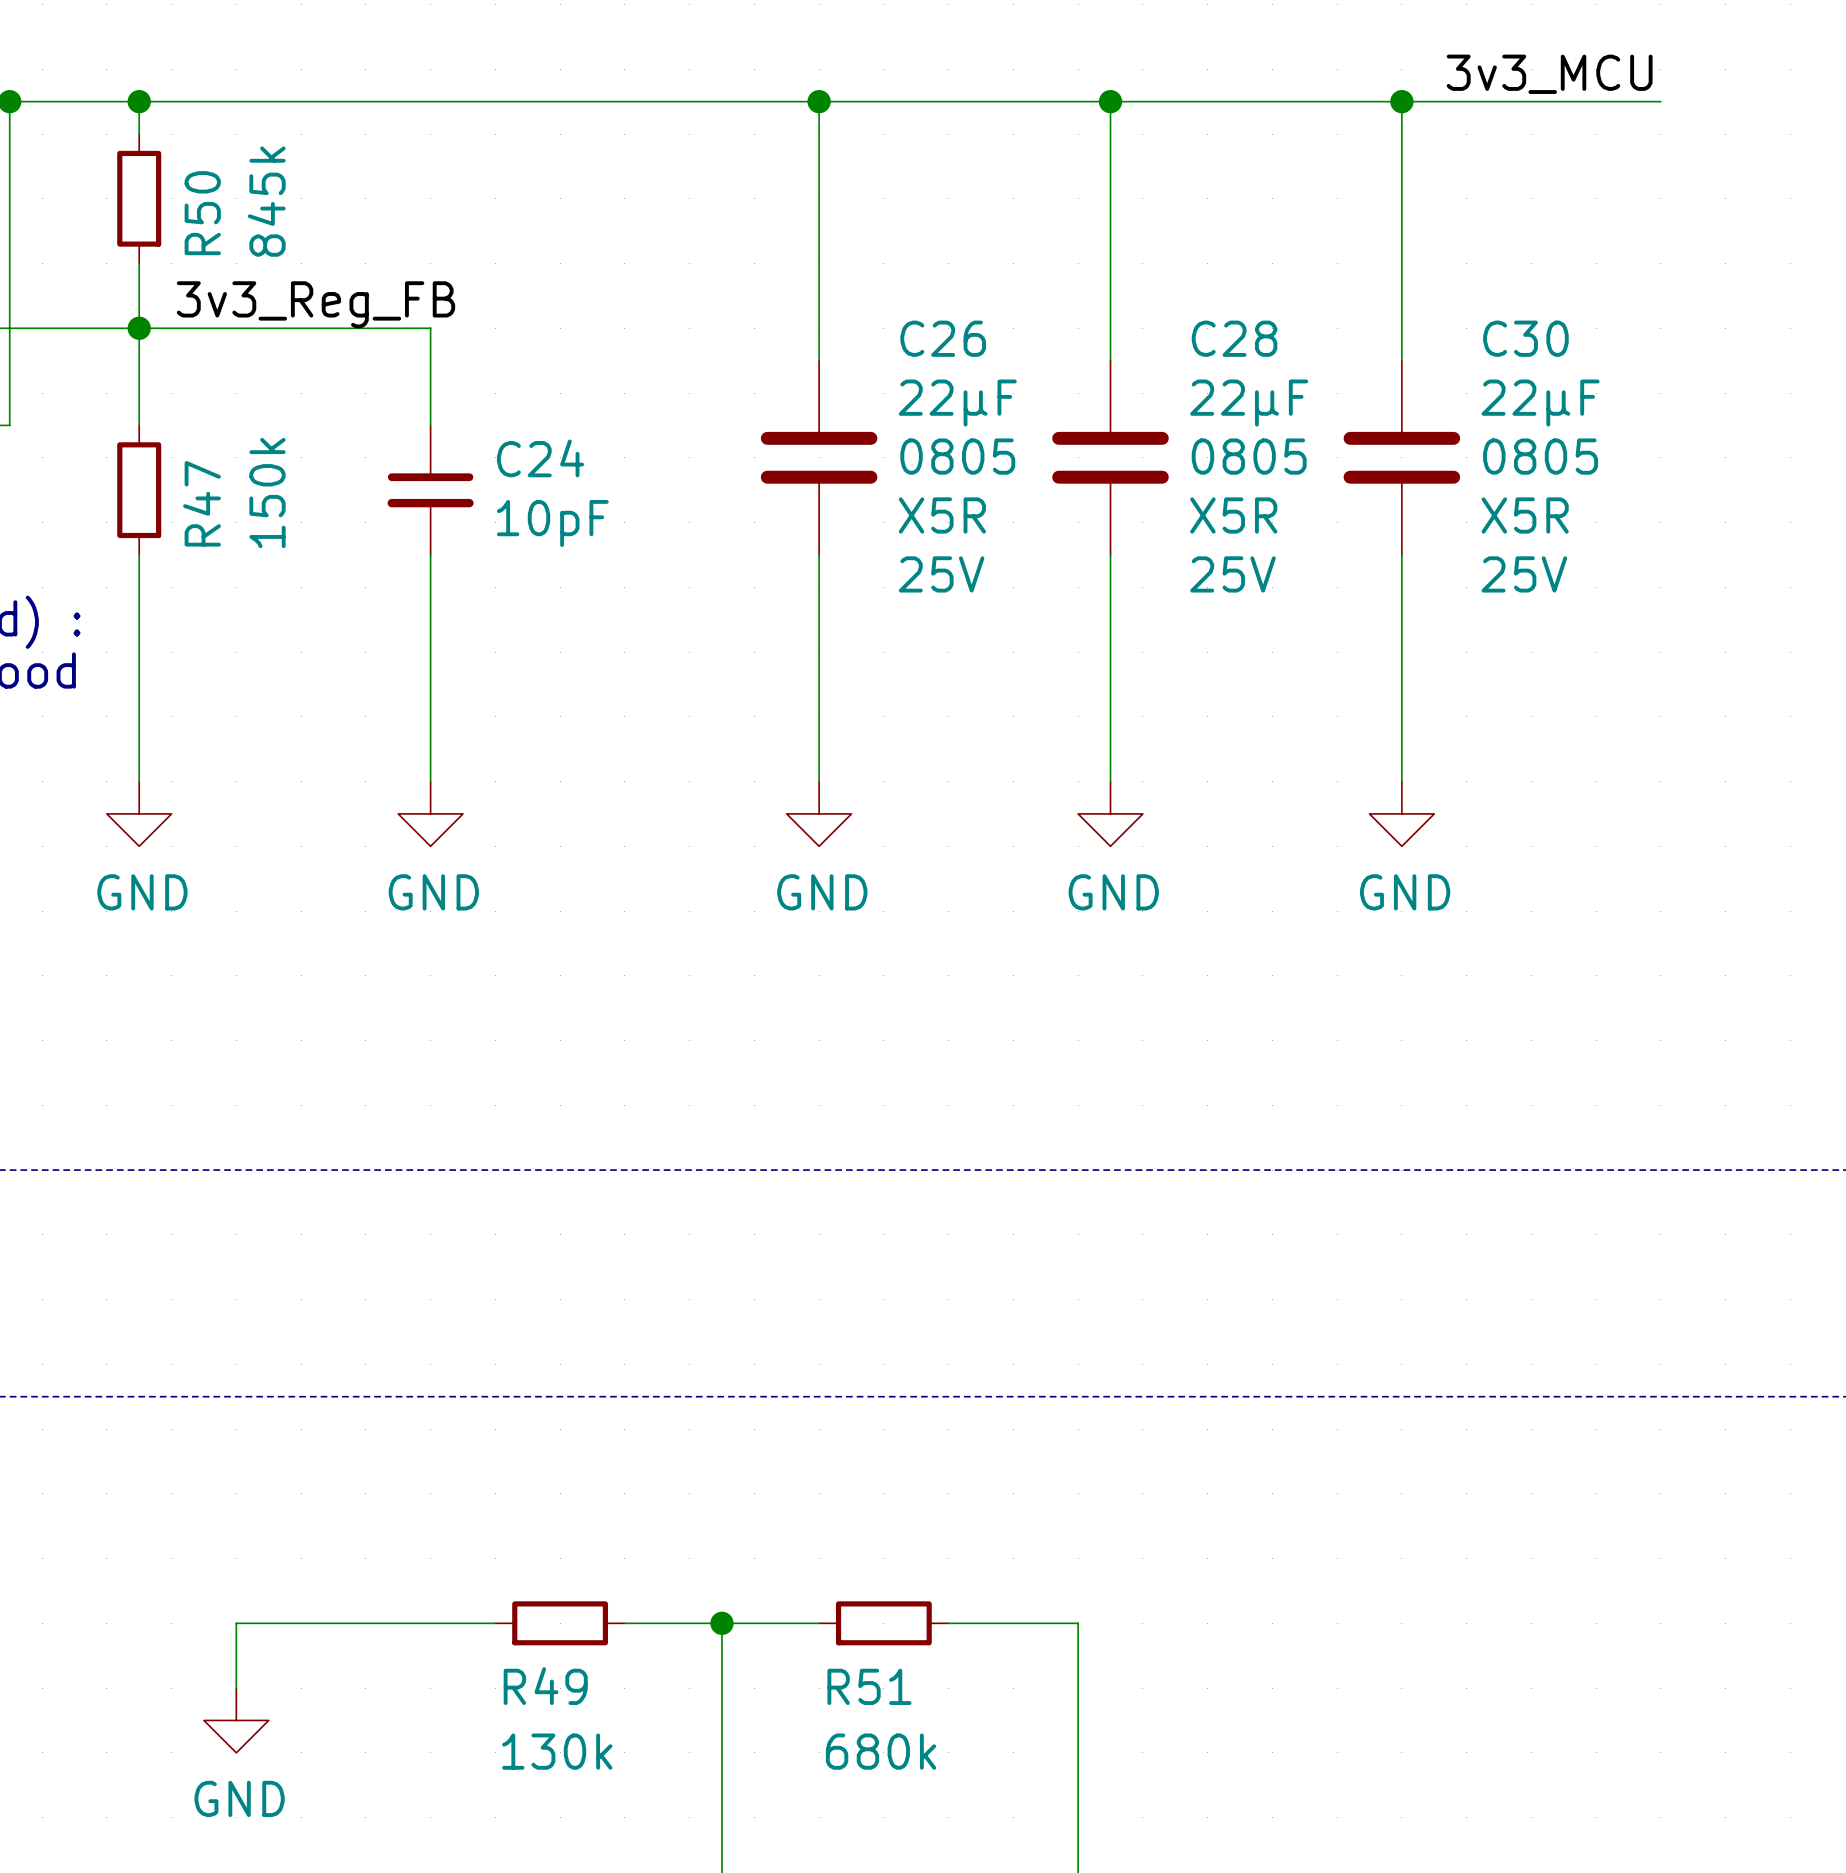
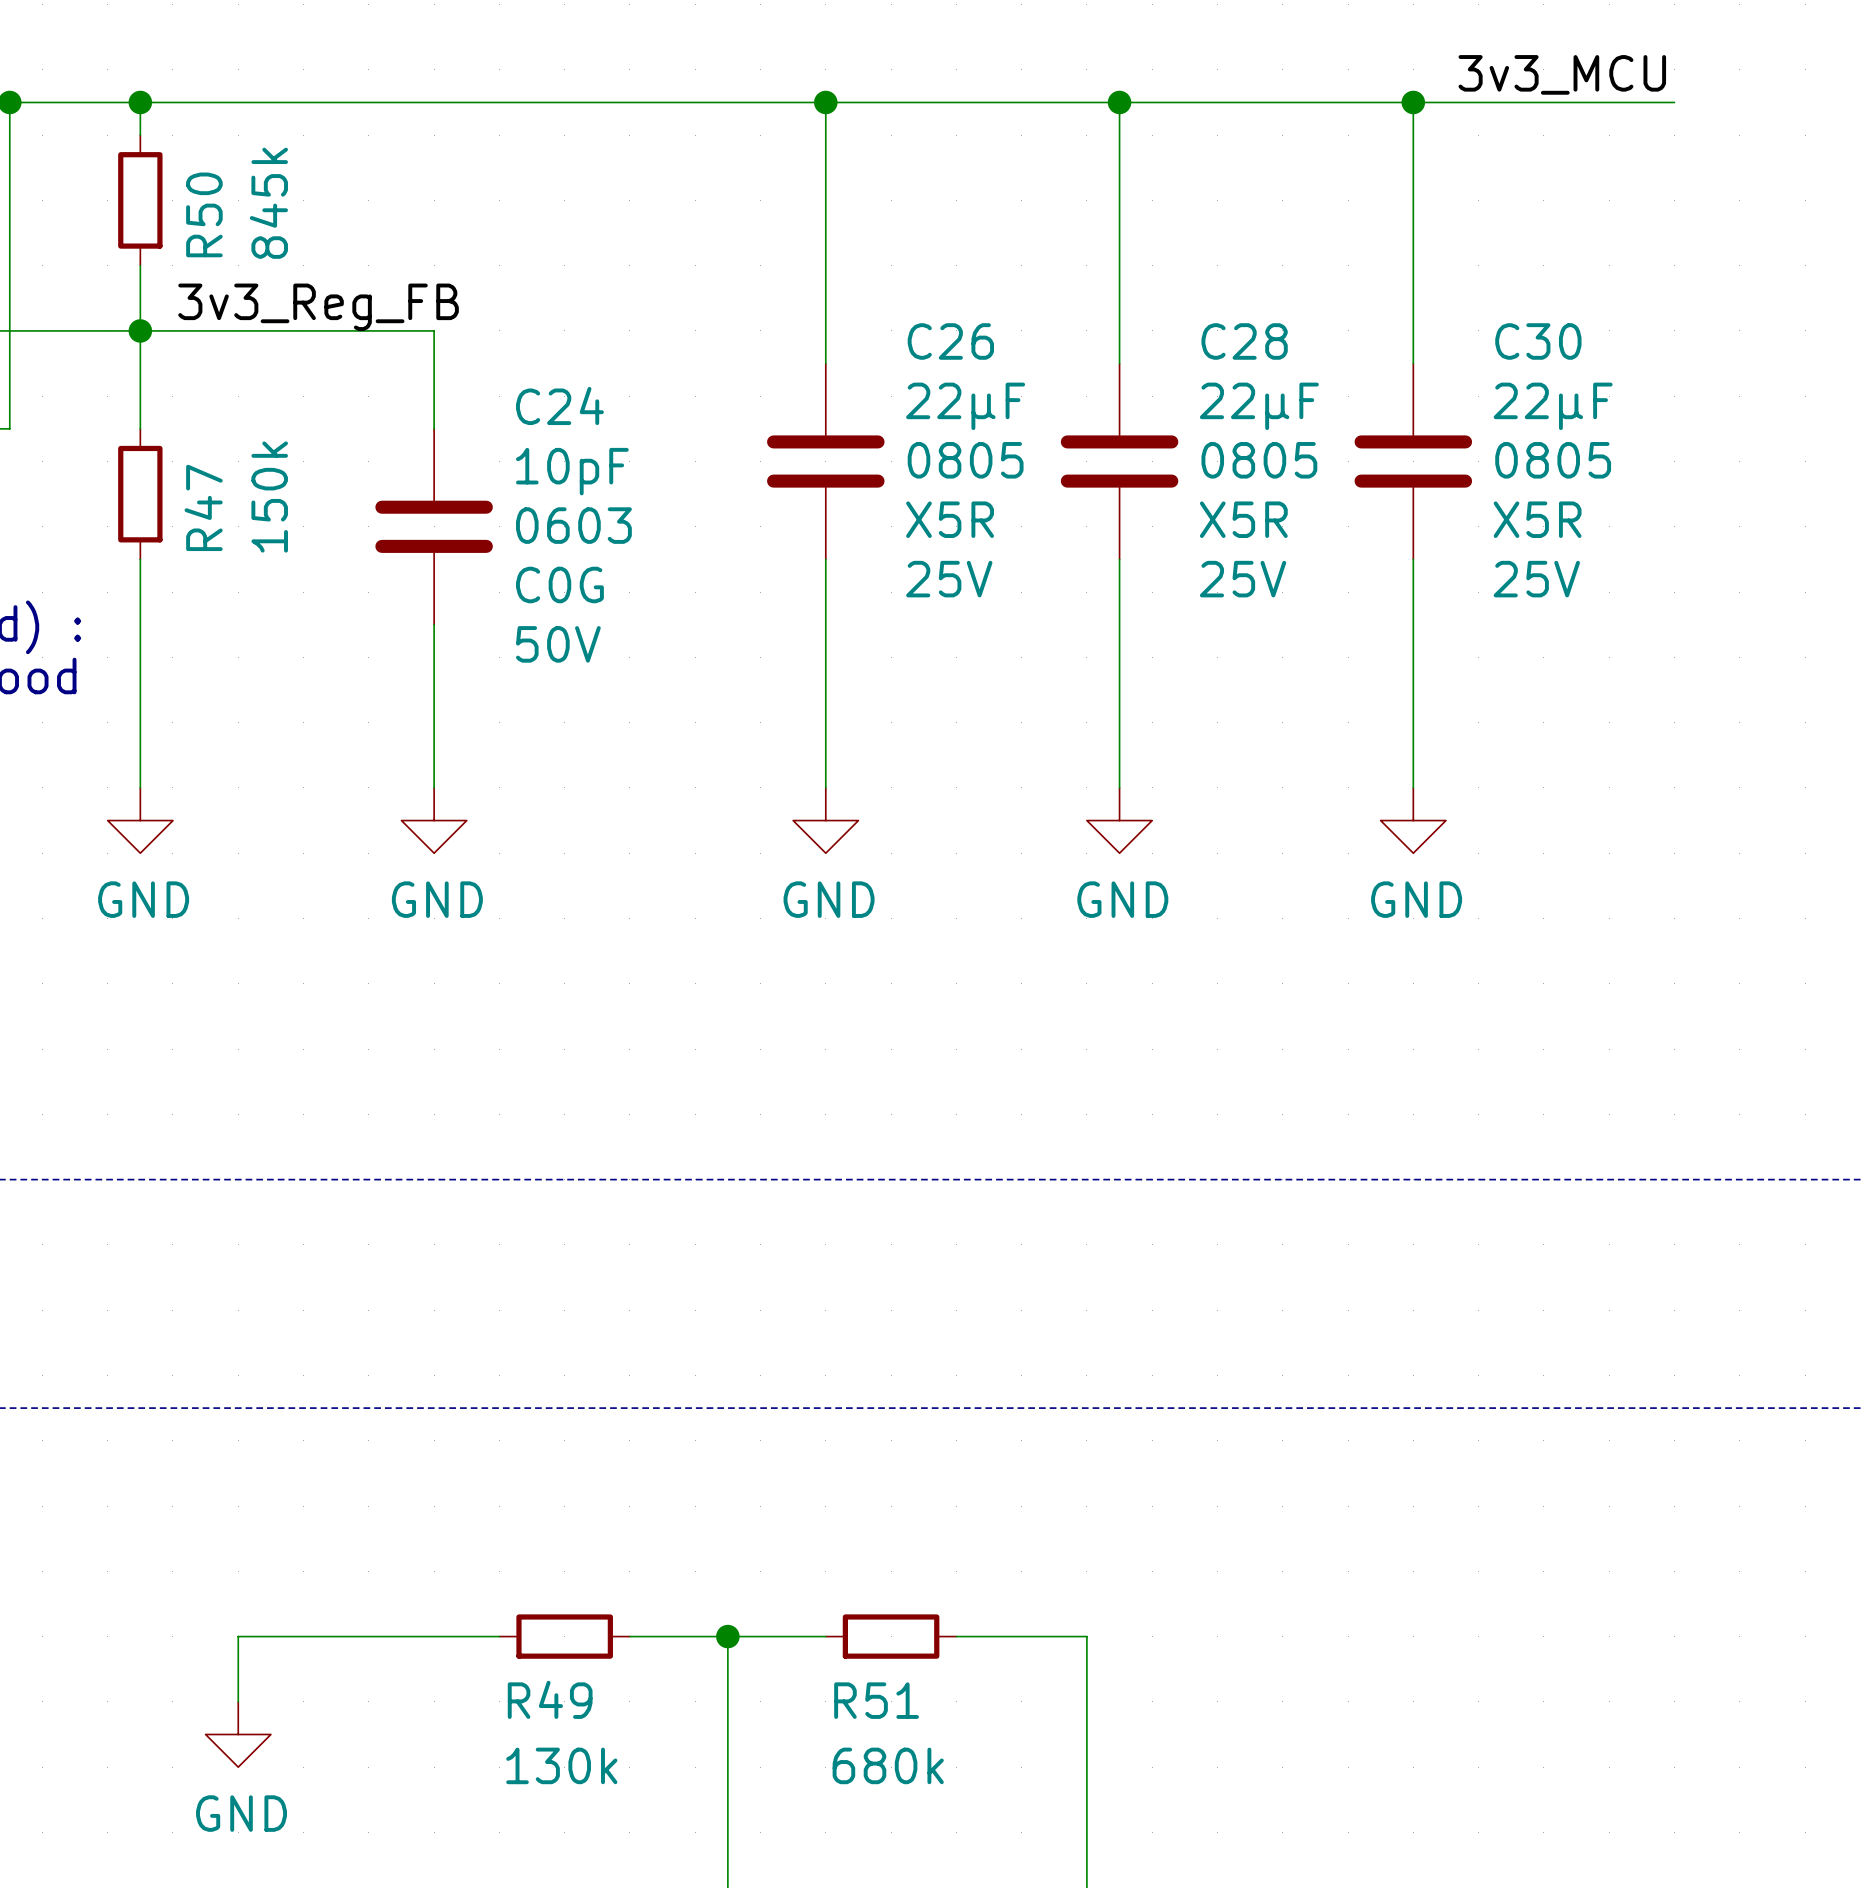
C24 symbol: [387, 425, 474, 555] -> [375, 428, 493, 625]
C24 name position: C24 (540, 458) -> C24 (559, 405)
C24 text: none -> 10pF (572, 471)
C24 text: none -> 0603 (573, 525)
C24 value: 10pF (552, 523) -> none
C24 text: none -> C0G (559, 584)
C24 text: none -> 50V (558, 644)

